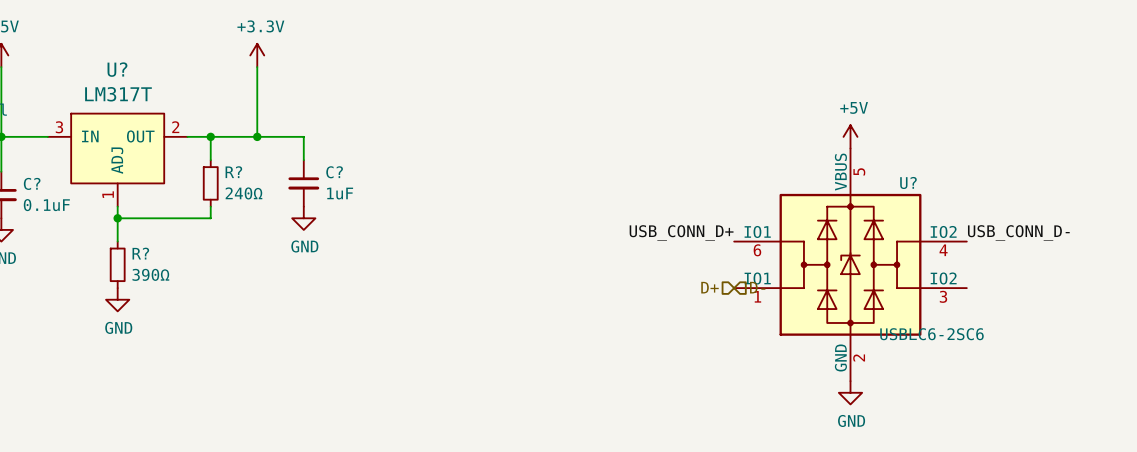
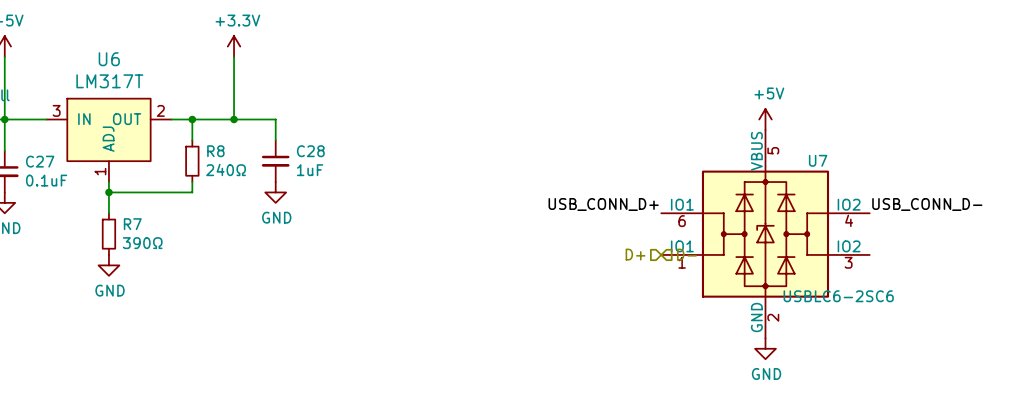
U? name: U? (117, 69) -> U6 (109, 59)
R? name: R? (233, 172) -> R8 (215, 151)
C? name: C? (334, 172) -> C28 (310, 151)
U? name: U? (908, 182) -> U7 (818, 160)
C? name: C? (32, 183) -> C27 (40, 161)
R? name: R? (140, 253) -> R7 (132, 224)

